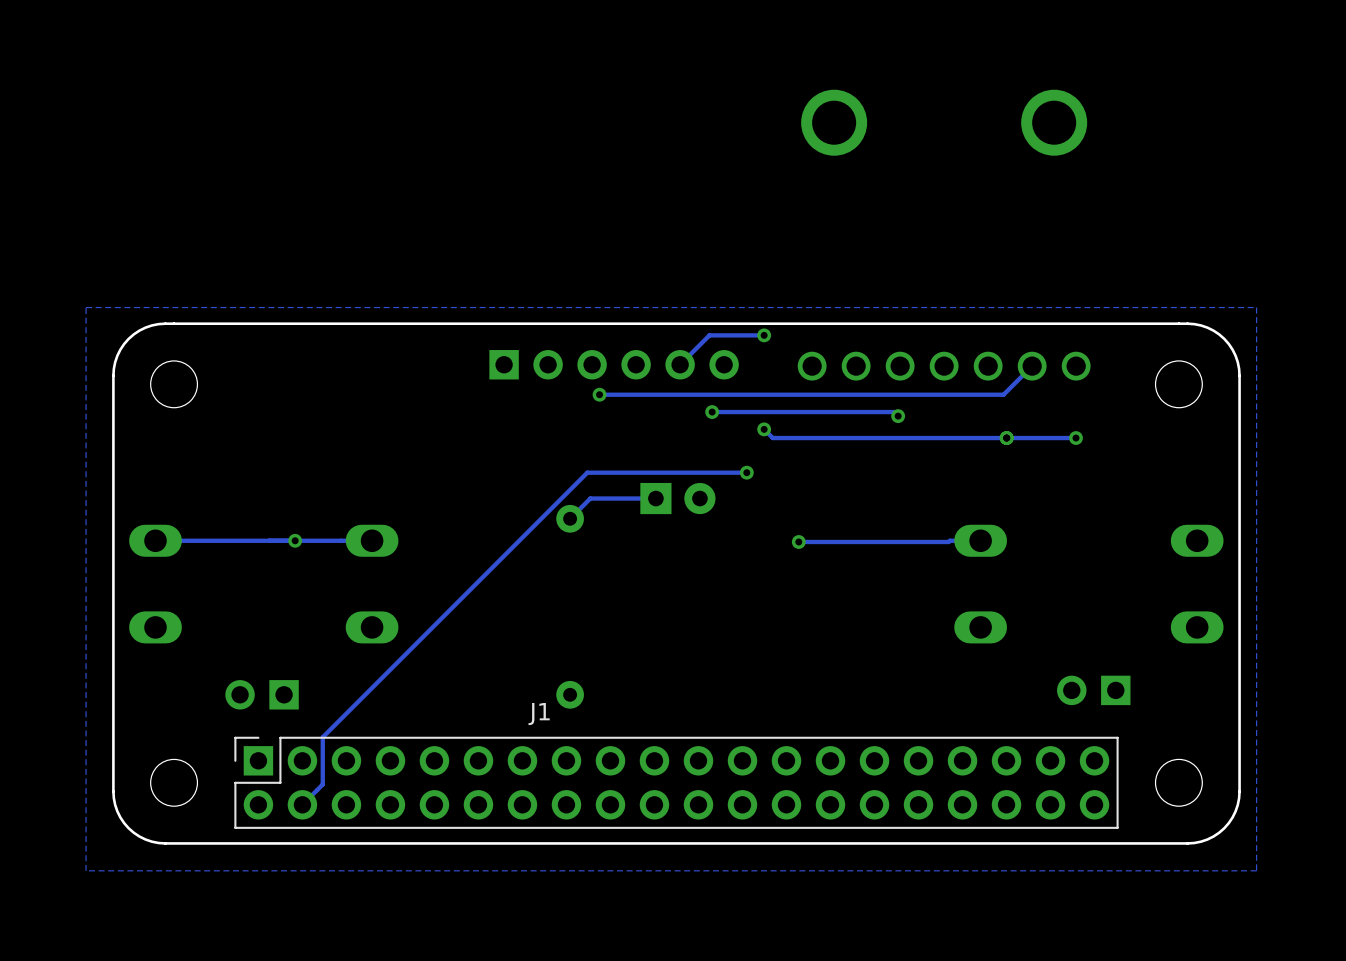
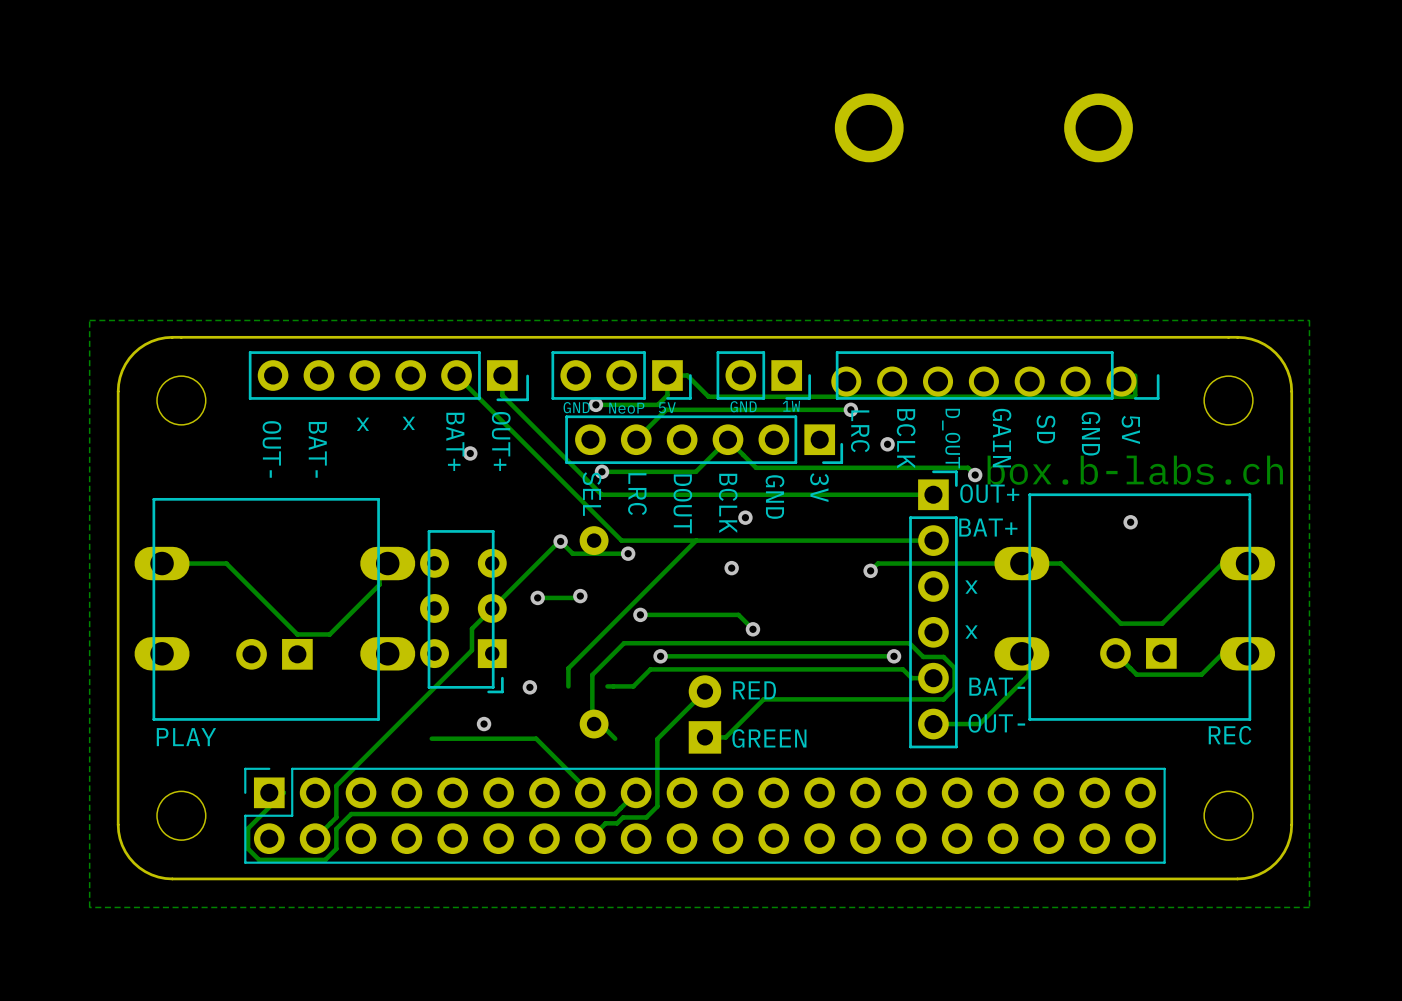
track: (764, 335) (709, 335) (680, 364) -> none
via: (764, 335) -> none
line: none -> (479, 352) (250, 352) (250, 398) (479, 398) (479, 352)
line: none -> (644, 352) (552, 352) (552, 398) (644, 398) (644, 352)
line: none -> (763, 352) (717, 352) (717, 398) (763, 398) (763, 352)
line: none -> (1112, 352) (837, 352) (837, 398) (1112, 398) (1112, 352)
part: none -> (387, 375)
track: none -> (456, 375) (621, 540) (933, 540)
track: none -> (502, 375) (502, 395) (601, 494) (933, 494)
line: none -> (527, 375) (527, 399) (497, 399)
part: none -> (621, 375)
line: none -> (690, 375) (690, 398) (667, 398)
part: none -> (763, 375)
line: none -> (809, 375) (809, 398) (786, 398)
track: none -> (1135, 375) (1133, 396) (708, 396) (687, 375) (667, 375) (667, 395) (657, 404) (595, 404)
line: none -> (1158, 375) (1158, 398) (1135, 398)
part rotation: 0° (614, 364) -> 180° (705, 439)
track: (1032, 366) (1003, 394) (599, 394) -> none
text: none -> 1W (791, 406)
text: none -> GND (743, 406)
text: none -> GND (576, 407)
text: none -> NeoP (626, 408)
text: none -> 5V (667, 407)
track: none -> (850, 409) (666, 409) (636, 439)
via: none -> (850, 409)
via position: (599, 394) -> (595, 404)
line: none -> (795, 416) (566, 416) (566, 462) (795, 462) (795, 416)
text: none -> x (408, 423)
text: none -> x (362, 424)
track: (712, 412) (894, 412) (898, 416) -> none
via: (712, 412) -> none
text: none -> SD (1046, 429)
text: none -> 5V (1130, 429)
text: none -> LRC (860, 431)
via: (898, 416) -> none
text: none -> GND (1090, 433)
text: none -> GAIN (1001, 438)
text: none -> BCLK (906, 438)
text: none -> D_OUT (951, 438)
text: none -> BAT+ (455, 441)
text: none -> OUT+ (501, 441)
line: none -> (841, 444) (841, 462) (823, 462)
via: none -> (887, 444)
track: (764, 429) (772, 438) (1076, 438) -> none
via: (764, 429) -> none
text: none -> OUT- (271, 449)
text: none -> BAT- (317, 449)
via: none -> (470, 453)
via: (1006, 438) -> none
via: (1076, 438) -> none
text: none -> box.b-labs.ch (1135, 470)
track: none -> (601, 471) (695, 471) (728, 439) (756, 467) (967, 467) (975, 475)
via: none -> (601, 471)
line: none -> (933, 471) (956, 471) (956, 485)
via: none -> (975, 475)
text: none -> 3V (819, 487)
track: (746, 472) (587, 472) (322, 737) (322, 754) -> (628, 553) (572, 553) (559, 541) (471, 628) (471, 650) (336, 785)
via position: (746, 472) -> (745, 517)
text: none -> LRC (637, 494)
text: none -> OUT+ (989, 493)
line: none -> (1249, 494) (1249, 719) (1029, 719) (1029, 494) (1249, 494)
text: none -> SEL (592, 494)
text: none -> GND (774, 497)
line: none -> (378, 499) (153, 499) (153, 719) (378, 719) (378, 499)
text: none -> DOUT (682, 503)
text: none -> BCLK (728, 503)
line: none -> (956, 517) (910, 517) (910, 746) (956, 746) (956, 517)
track: (655, 498) (590, 498) (570, 518) -> none
part rotation: 0° (677, 498) -> 90° counterclockwise (704, 714)
part position: (677, 498) -> (704, 714)
via: none -> (1130, 522)
text: none -> BAT+ (988, 527)
line: none -> (493, 531) (429, 531) (429, 687) (493, 687) (493, 531)
track: none -> (696, 540) (568, 668) (568, 686)
via: none -> (560, 541)
via: none -> (628, 553)
via: (295, 540) -> none
track: (372, 540) (217, 540) -> (379, 563) (379, 584) (329, 634) (297, 634) (226, 563)
track: (949, 540) (798, 541) -> (989, 563) (877, 563) (870, 570)
track: none -> (1254, 563) (1222, 563) (1162, 623) (1120, 623) (1060, 563) (1021, 563)
via position: (798, 541) -> (870, 570)
via: none -> (731, 568)
text: none -> x (971, 587)
track: none -> (580, 596) (578, 597) (537, 597)
via: none -> (580, 596)
via: none -> (537, 597)
part: none -> (463, 608)
part: none -> (933, 609)
track: none -> (640, 614) (738, 614) (752, 629)
via: none -> (640, 614)
via: none -> (752, 629)
text: none -> x (971, 632)
track: none -> (1028, 653) (1028, 675) (979, 724) (933, 724)
track: none -> (1115, 653) (1136, 674) (1201, 674) (1222, 653) (1254, 653)
via: none -> (660, 656)
track: none -> (894, 656) (660, 656)
via: none -> (894, 656)
line: none -> (502, 678) (502, 691) (488, 691)
track: none -> (933, 678) (911, 678) (902, 669) (650, 669) (633, 686) (607, 686)
text: none -> BAT- (997, 686)
via: none -> (529, 687)
text: none -> RED (754, 690)
track: none -> (704, 691) (657, 739) (657, 806) (646, 817) (623, 817) (617, 823) (605, 823) (590, 838)
part position: (1093, 690) -> (1138, 653)
part position: (262, 694) -> (274, 654)
via: none -> (484, 724)
text: none -> OUT- (996, 723)
text: none -> REC (1230, 735)
text: none -> PLAY (186, 737)
track: none -> (704, 737) (725, 737) (763, 699) (943, 699) (954, 688) (954, 667) (943, 656) (923, 656) (909, 643) (624, 643) (592, 674) (592, 715) (615, 738)
track: none -> (431, 738) (536, 738) (590, 792)
text: none -> GREEN (769, 738)
J1 name: J1 (539, 714) -> none
track: none -> (636, 792) (614, 814) (351, 814) (336, 828) (336, 848) (325, 859) (259, 859) (248, 848) (248, 828) (283, 792) (269, 792)

